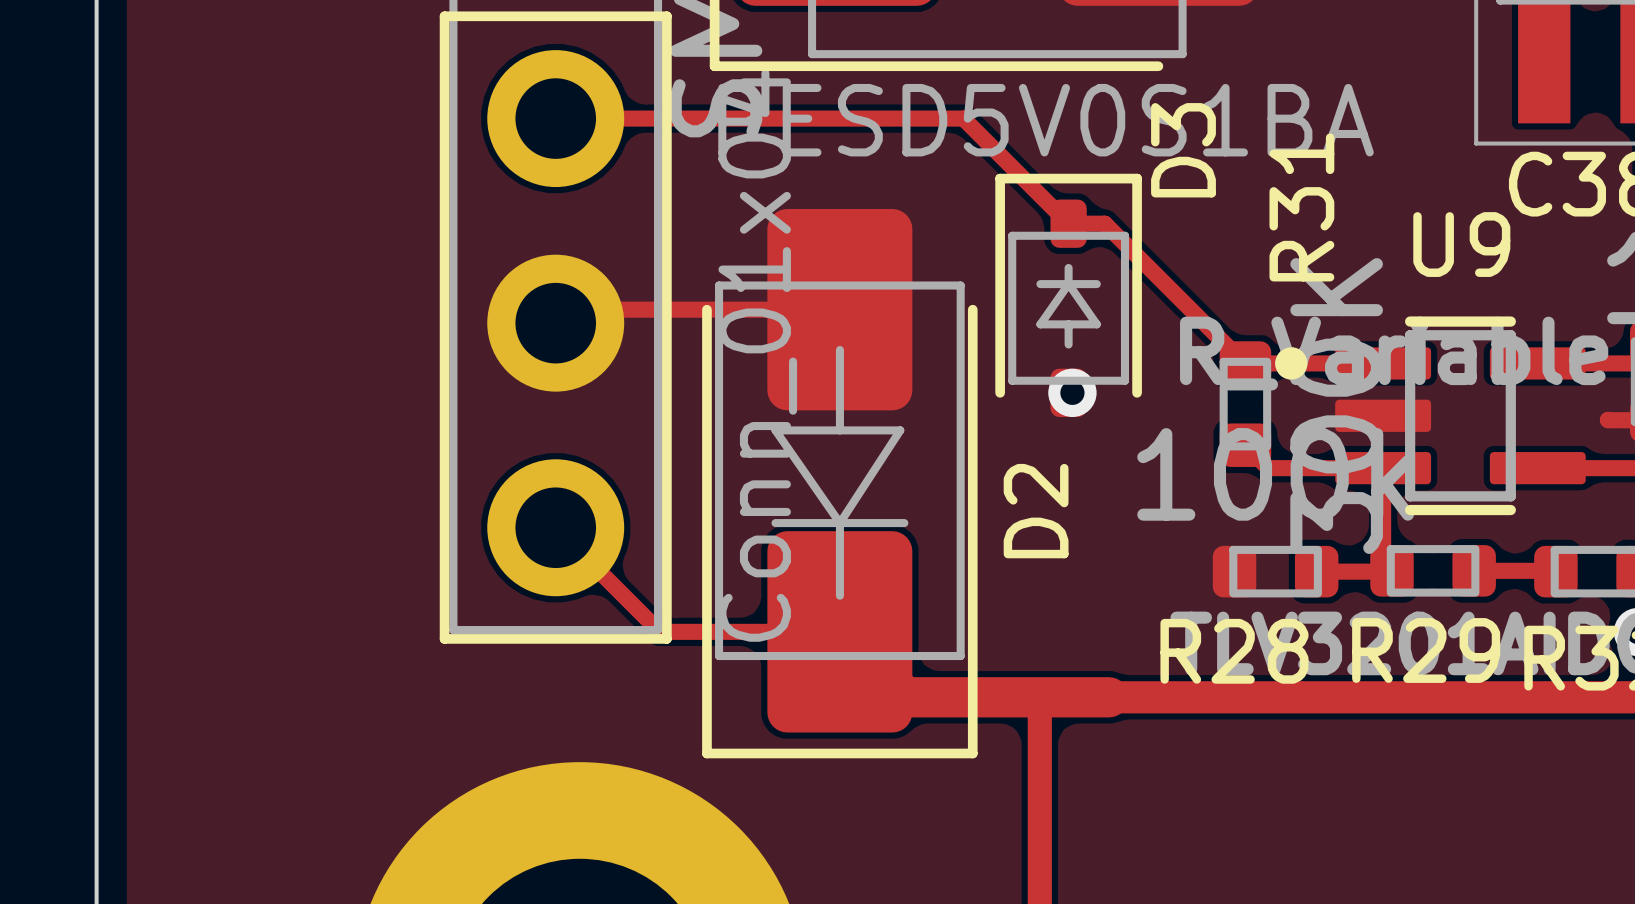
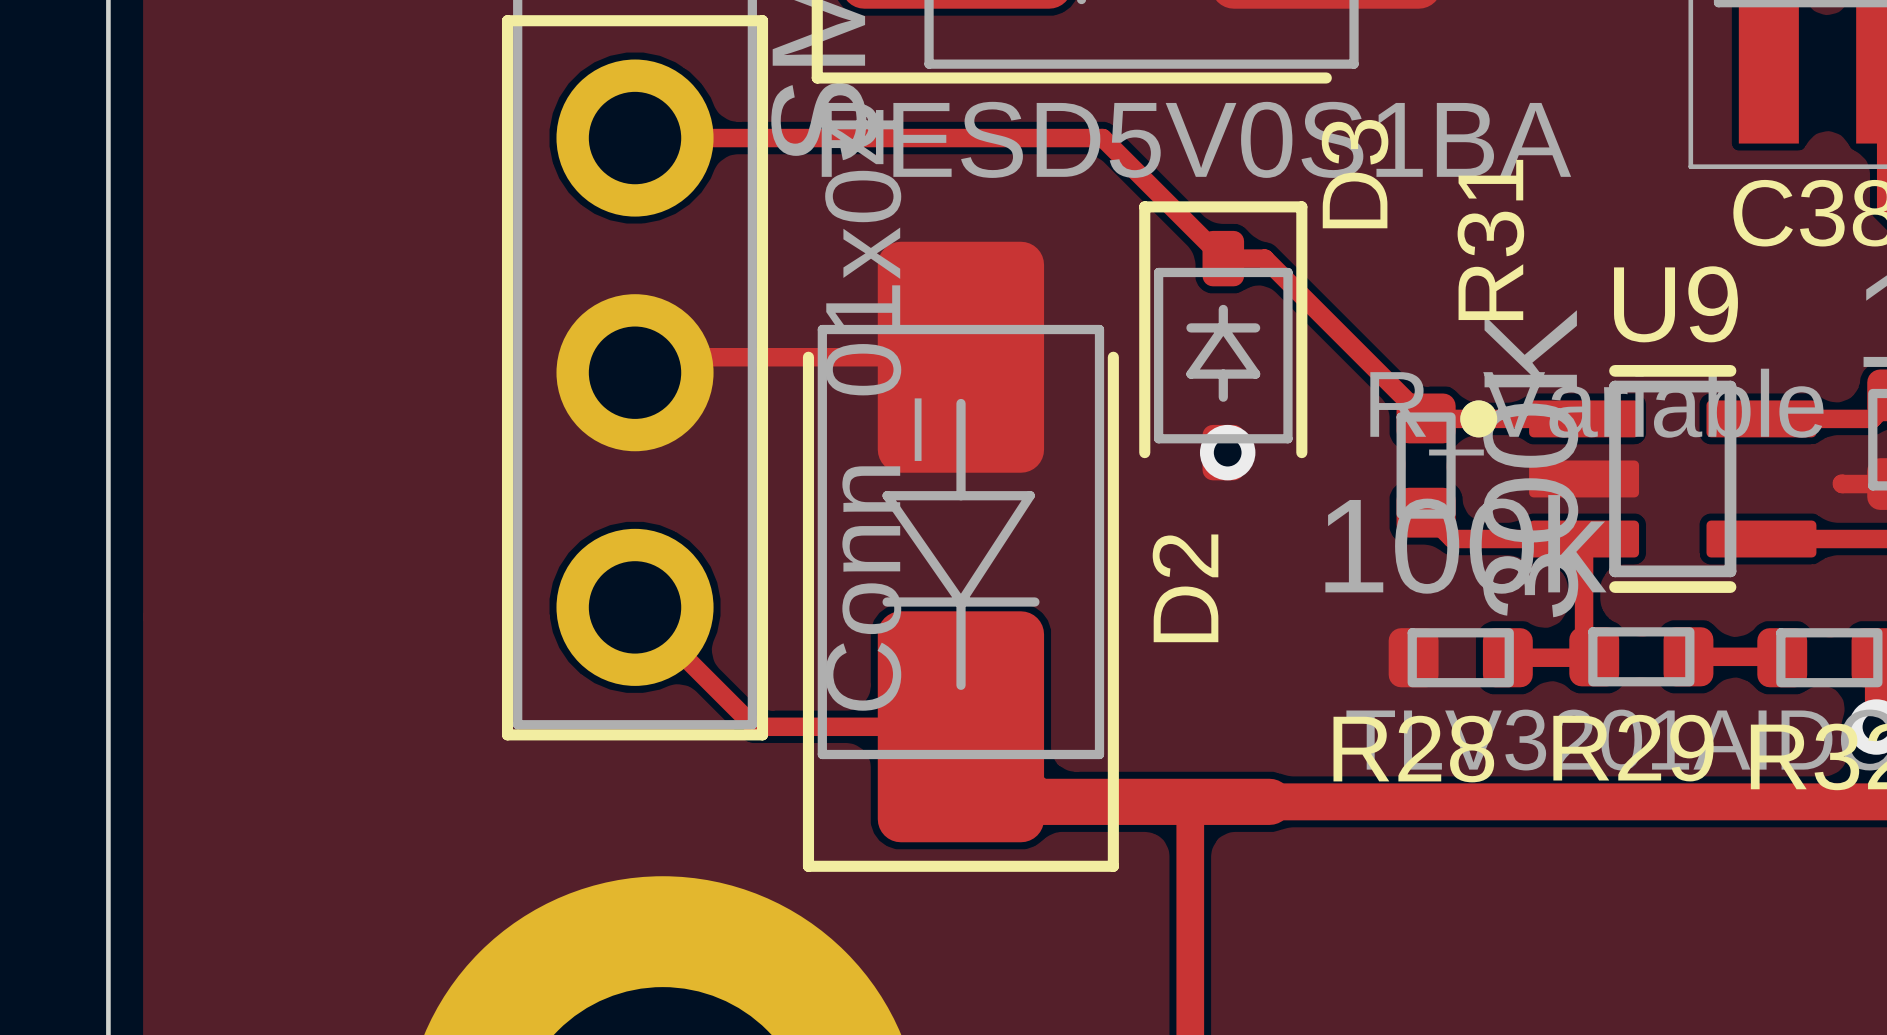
U9 name position: U9 (1461, 244) -> U9 (1675, 304)

